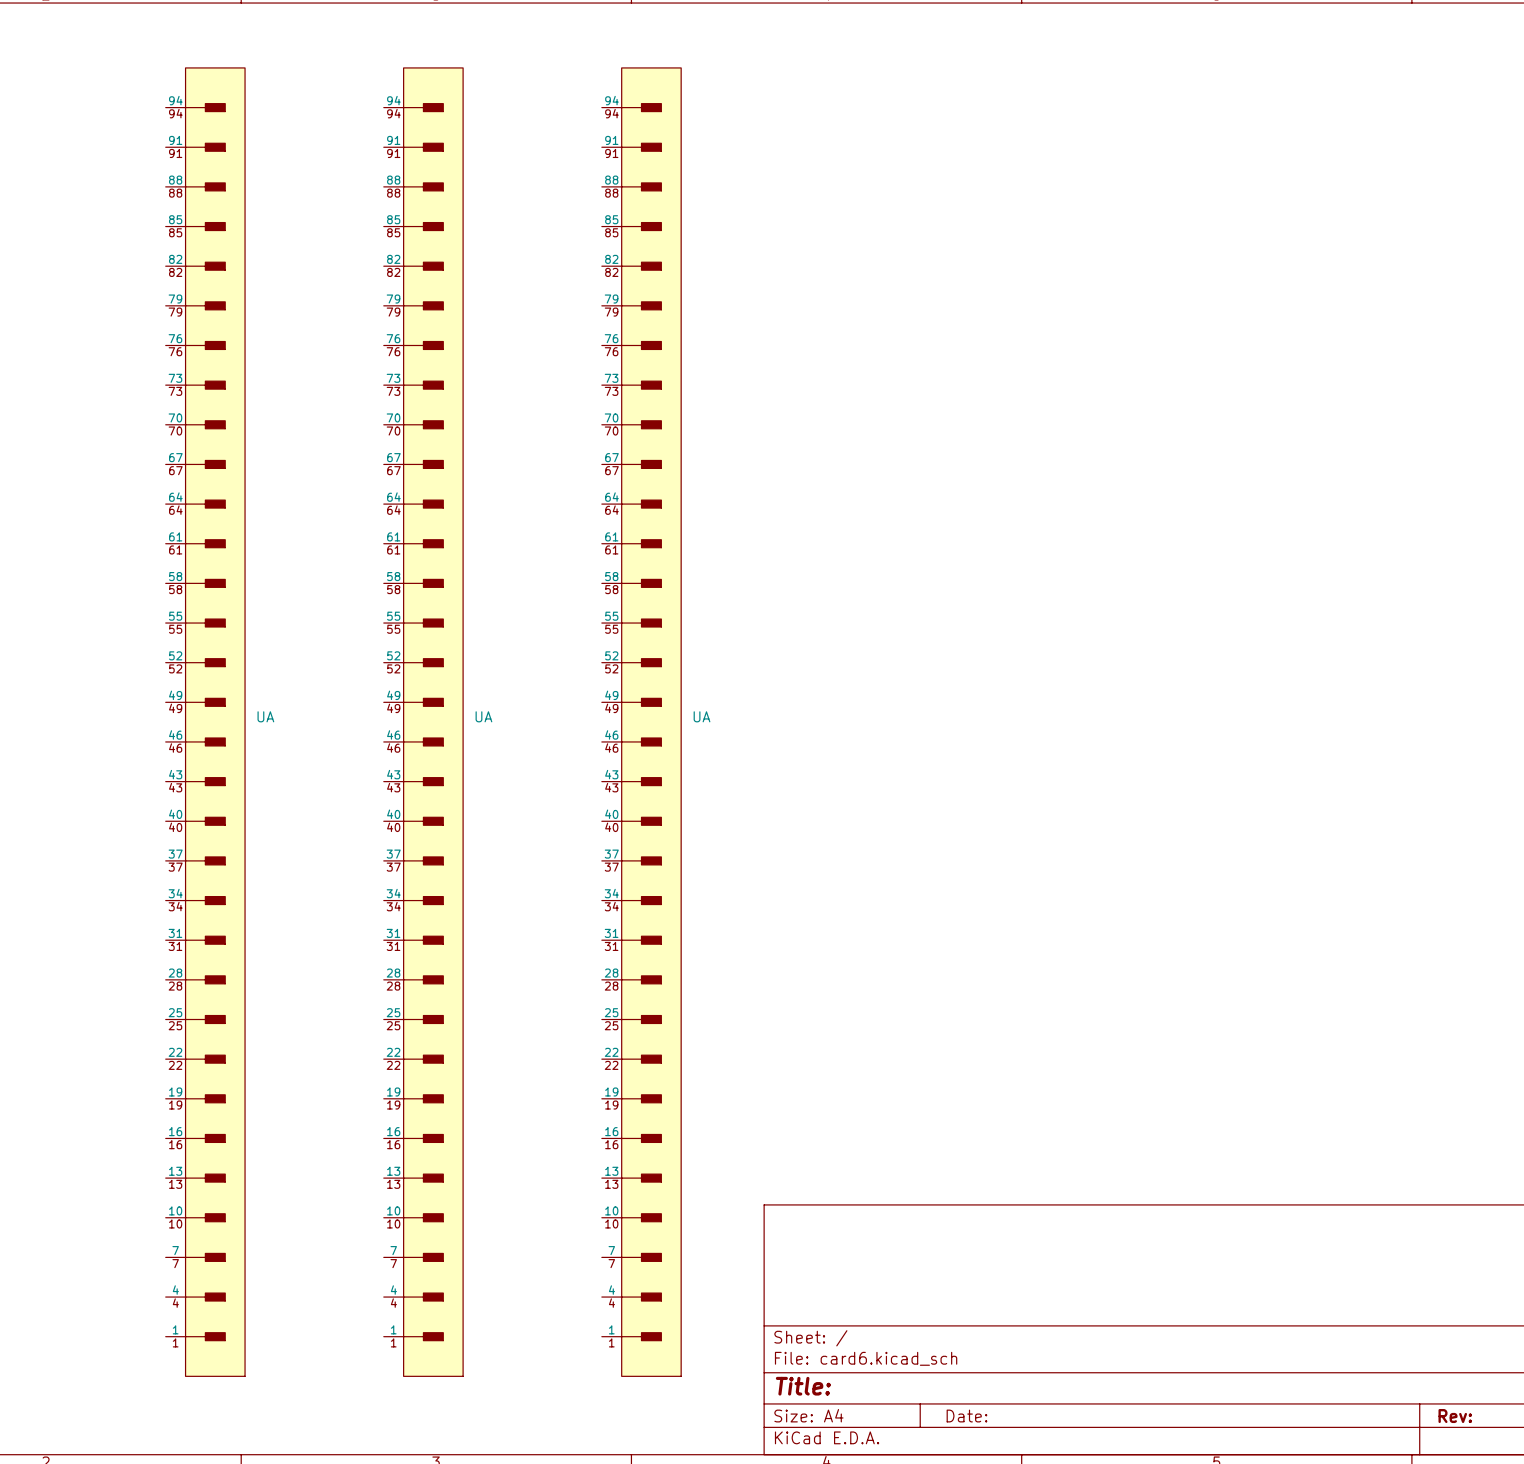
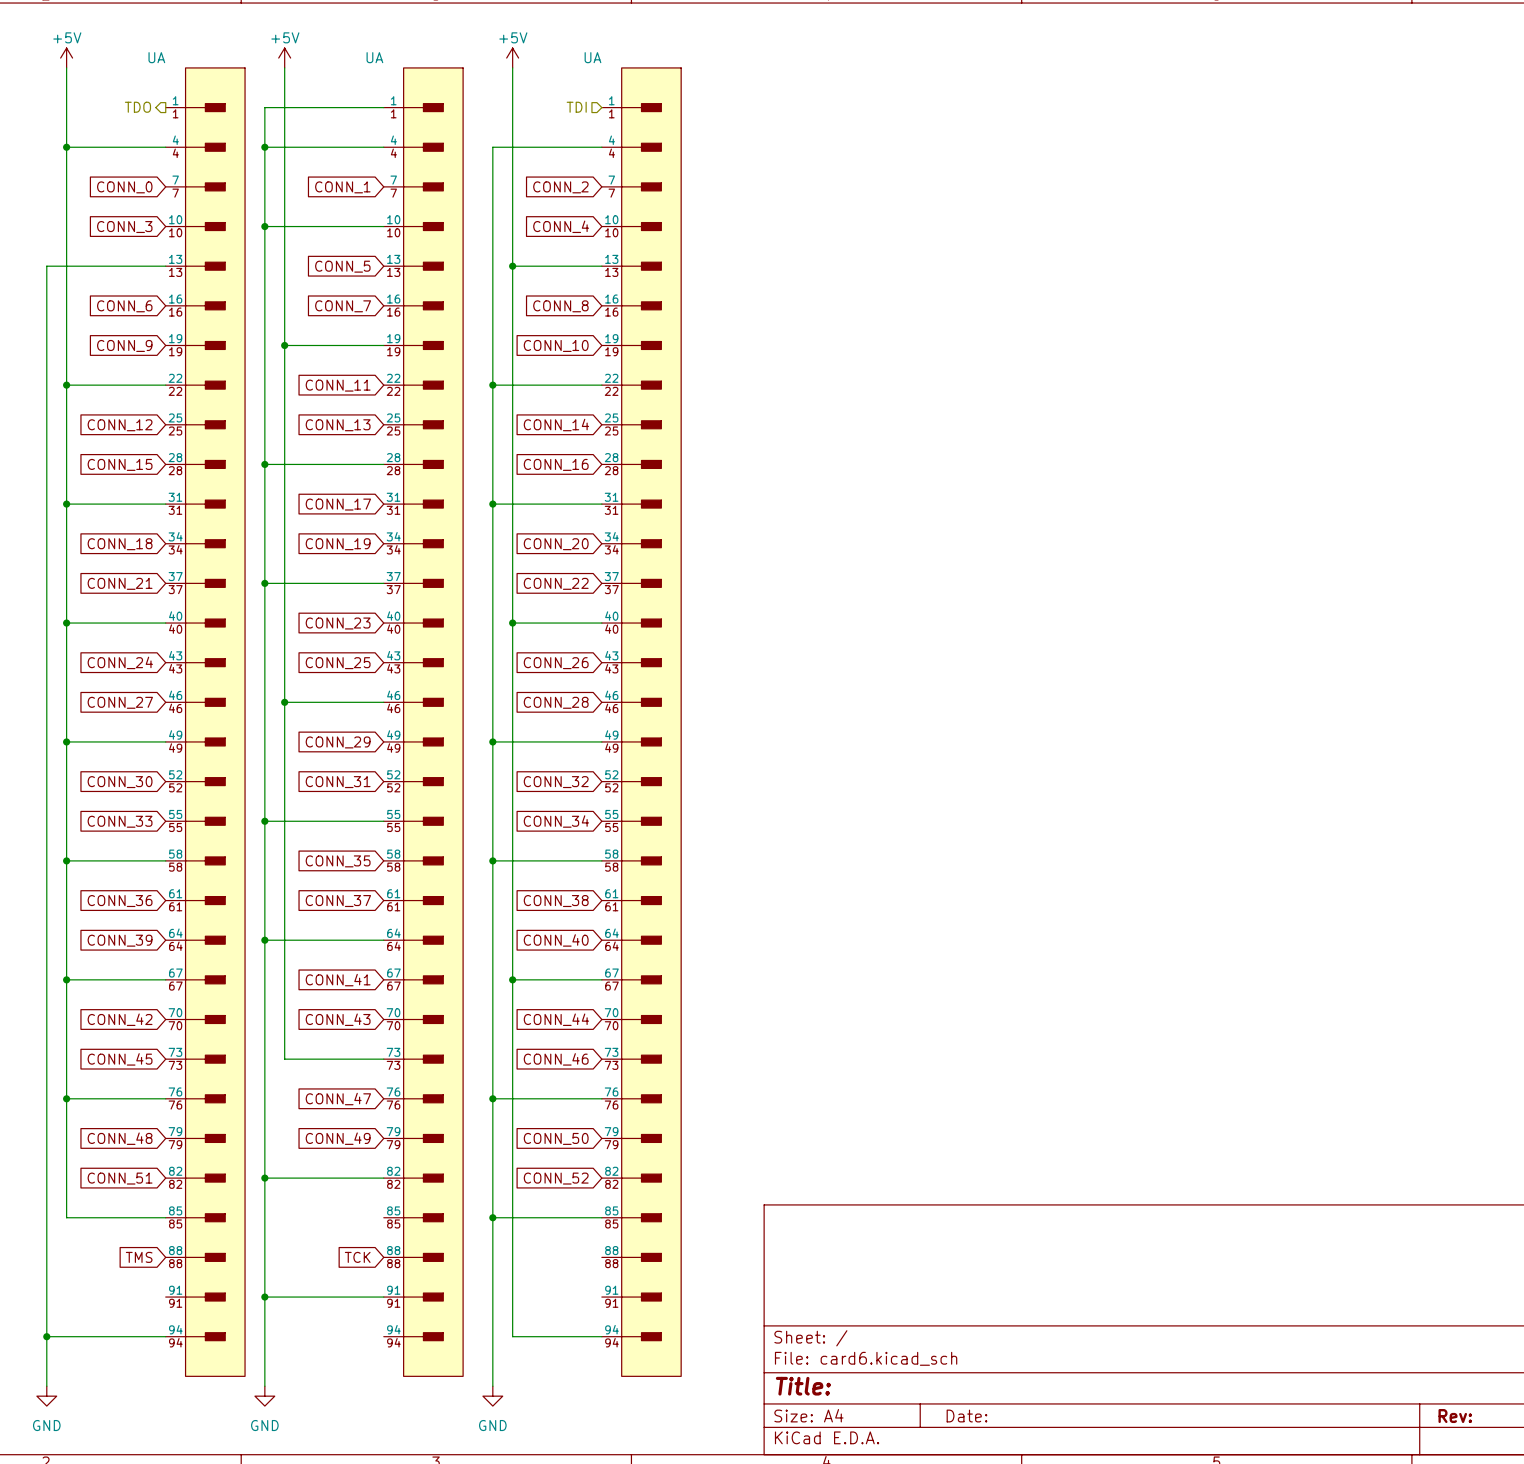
power symbol: none -> +5V (66, 58)
power symbol: none -> +5V (284, 58)
power symbol: none -> +5V (512, 58)
wire: none -> (66, 67) (66, 1217) (165, 1217)
wire: none -> (284, 67) (284, 1059) (383, 1059)
wire: none -> (512, 67) (512, 1336) (601, 1336)
hierarchical label: none -> TDO (137, 107)
wire: none -> (383, 107) (264, 107) (264, 1386)
hierarchical label: none -> TDI (576, 107)
wire: none -> (66, 147) (165, 147)
junction: none -> (66, 147)
wire: none -> (264, 147) (383, 147)
junction: none -> (264, 147)
wire: none -> (601, 147) (492, 147) (492, 1386)
global label: none -> CONN_0 (124, 187)
global label: none -> CONN_1 (342, 187)
global label: none -> CONN_2 (560, 187)
wire: none -> (264, 226) (383, 226)
junction: none -> (264, 226)
global label: none -> CONN_4 (561, 226)
global label: none -> CONN_3 (124, 227)
wire: none -> (165, 266) (46, 266) (46, 1386)
global label: none -> CONN_5 (342, 266)
wire: none -> (512, 266) (601, 266)
junction: none -> (512, 266)
global label: none -> CONN_6 (124, 306)
global label: none -> CONN_7 (343, 306)
global label: none -> CONN_8 (560, 306)
global label: none -> CONN_9 (124, 345)
wire: none -> (284, 345) (383, 345)
junction: none -> (284, 345)
global label: none -> CONN_10 (556, 345)
wire: none -> (66, 385) (165, 385)
junction: none -> (66, 385)
global label: none -> CONN_11 (338, 385)
wire: none -> (492, 385) (601, 385)
junction: none -> (492, 385)
global label: none -> CONN_12 (120, 425)
global label: none -> CONN_13 (338, 425)
global label: none -> CONN_14 (556, 425)
global label: none -> CONN_15 (120, 464)
wire: none -> (264, 464) (383, 464)
junction: none -> (264, 464)
global label: none -> CONN_16 (556, 464)
wire: none -> (66, 504) (165, 504)
junction: none -> (66, 504)
global label: none -> CONN_17 (338, 504)
wire: none -> (492, 504) (601, 504)
junction: none -> (492, 504)
global label: none -> CONN_18 (120, 544)
global label: none -> CONN_19 (338, 544)
global label: none -> CONN_20 (556, 544)
global label: none -> CONN_21 (120, 583)
wire: none -> (264, 583) (383, 583)
junction: none -> (264, 583)
global label: none -> CONN_22 (556, 583)
wire: none -> (66, 623) (165, 623)
junction: none -> (66, 623)
global label: none -> CONN_23 (338, 623)
wire: none -> (512, 623) (601, 623)
junction: none -> (512, 623)
global label: none -> CONN_24 (120, 662)
global label: none -> CONN_25 (338, 663)
global label: none -> CONN_26 (556, 663)
global label: none -> CONN_27 (120, 702)
wire: none -> (284, 702) (383, 702)
junction: none -> (284, 702)
global label: none -> CONN_28 (556, 702)
UA name position: UA (265, 716) -> UA (156, 57)
UA name position: UA (483, 716) -> UA (374, 57)
UA name position: UA (702, 716) -> UA (592, 57)
UA flip: as is (215, 722) -> up-down (215, 722)
UA flip: as is (433, 722) -> up-down (433, 722)
UA flip: as is (651, 722) -> up-down (651, 722)
wire: none -> (66, 741) (165, 741)
junction: none -> (66, 741)
wire: none -> (492, 741) (601, 741)
junction: none -> (492, 741)
global label: none -> CONN_29 (338, 742)
global label: none -> CONN_30 (120, 782)
global label: none -> CONN_31 (338, 782)
global label: none -> CONN_32 (556, 782)
global label: none -> CONN_33 (120, 821)
wire: none -> (264, 821) (383, 821)
junction: none -> (264, 821)
global label: none -> CONN_34 (556, 821)
wire: none -> (66, 860) (165, 860)
junction: none -> (66, 860)
wire: none -> (492, 860) (601, 860)
junction: none -> (492, 860)
global label: none -> CONN_35 (338, 861)
global label: none -> CONN_36 (120, 901)
global label: none -> CONN_37 (338, 901)
global label: none -> CONN_38 (556, 901)
global label: none -> CONN_39 (120, 940)
wire: none -> (264, 940) (383, 940)
junction: none -> (264, 940)
global label: none -> CONN_40 (556, 940)
wire: none -> (66, 979) (165, 979)
junction: none -> (66, 979)
wire: none -> (512, 979) (601, 979)
junction: none -> (512, 979)
global label: none -> CONN_41 (338, 980)
global label: none -> CONN_42 (120, 1019)
global label: none -> CONN_43 (338, 1019)
global label: none -> CONN_44 (556, 1019)
global label: none -> CONN_45 (120, 1059)
global label: none -> CONN_46 (556, 1059)
wire: none -> (66, 1098) (165, 1098)
junction: none -> (66, 1098)
wire: none -> (492, 1098) (601, 1098)
junction: none -> (492, 1098)
global label: none -> CONN_47 (338, 1099)
global label: none -> CONN_48 (120, 1138)
global label: none -> CONN_49 (338, 1138)
global label: none -> CONN_50 (556, 1138)
global label: none -> CONN_51 (120, 1178)
wire: none -> (264, 1178) (383, 1178)
junction: none -> (264, 1178)
global label: none -> CONN_52 (556, 1178)
wire: none -> (492, 1217) (601, 1217)
junction: none -> (492, 1217)
global label: none -> TMS (139, 1257)
global label: none -> TCK (357, 1257)
wire: none -> (264, 1297) (383, 1297)
junction: none -> (264, 1297)
wire: none -> (46, 1336) (165, 1336)
junction: none -> (46, 1336)
power symbol: none -> GND (46, 1396)
power symbol: none -> GND (264, 1396)
power symbol: none -> GND (492, 1396)

